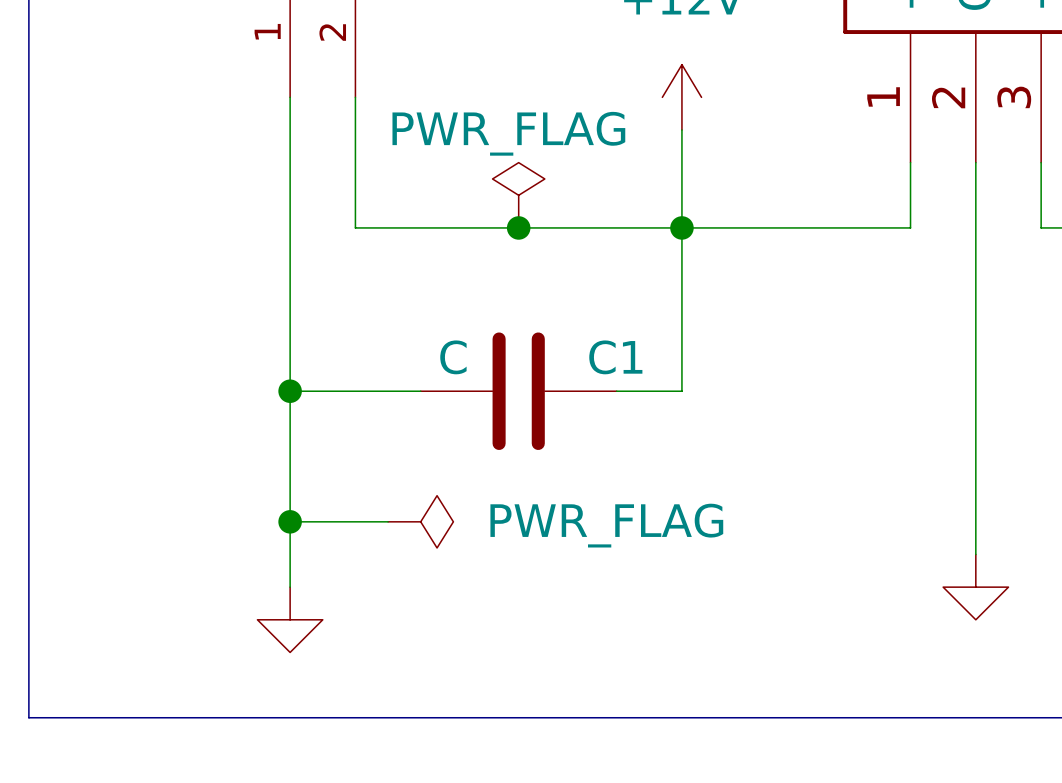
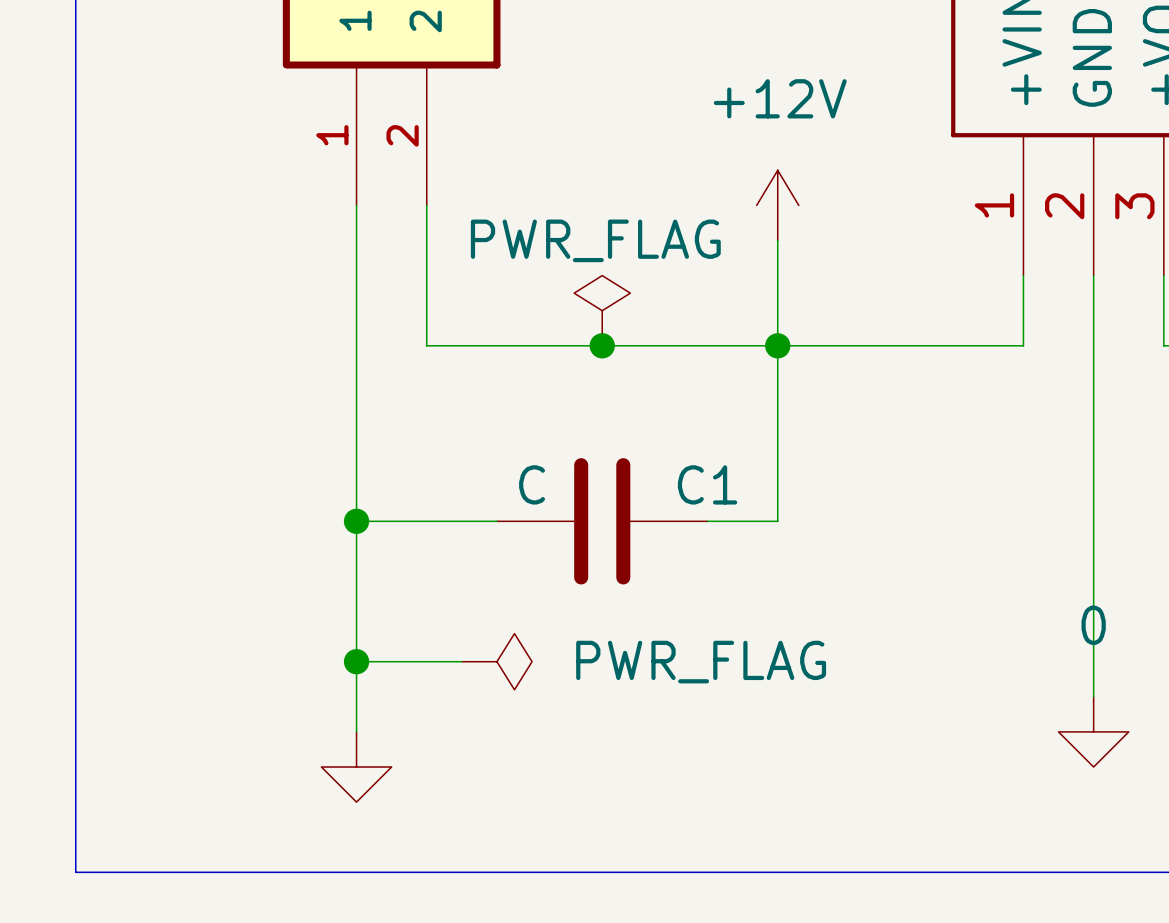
power symbol text: none -> 0 (1093, 625)

